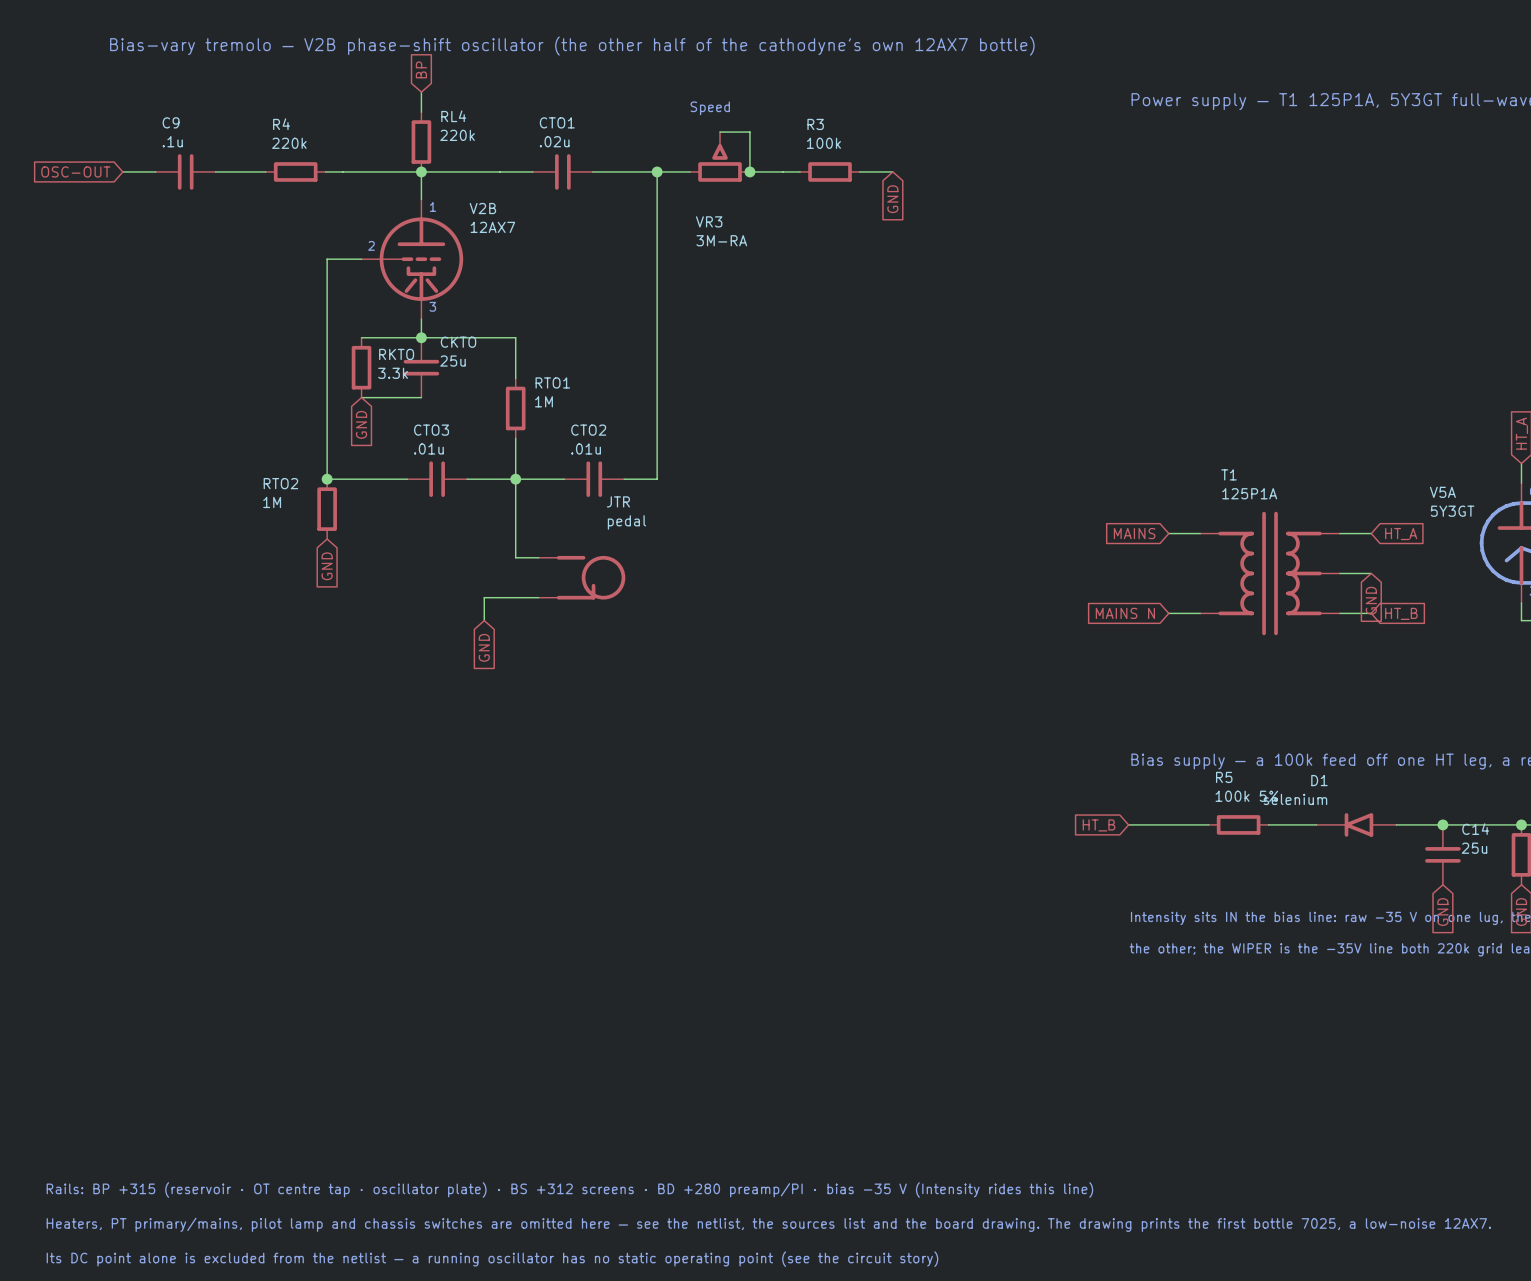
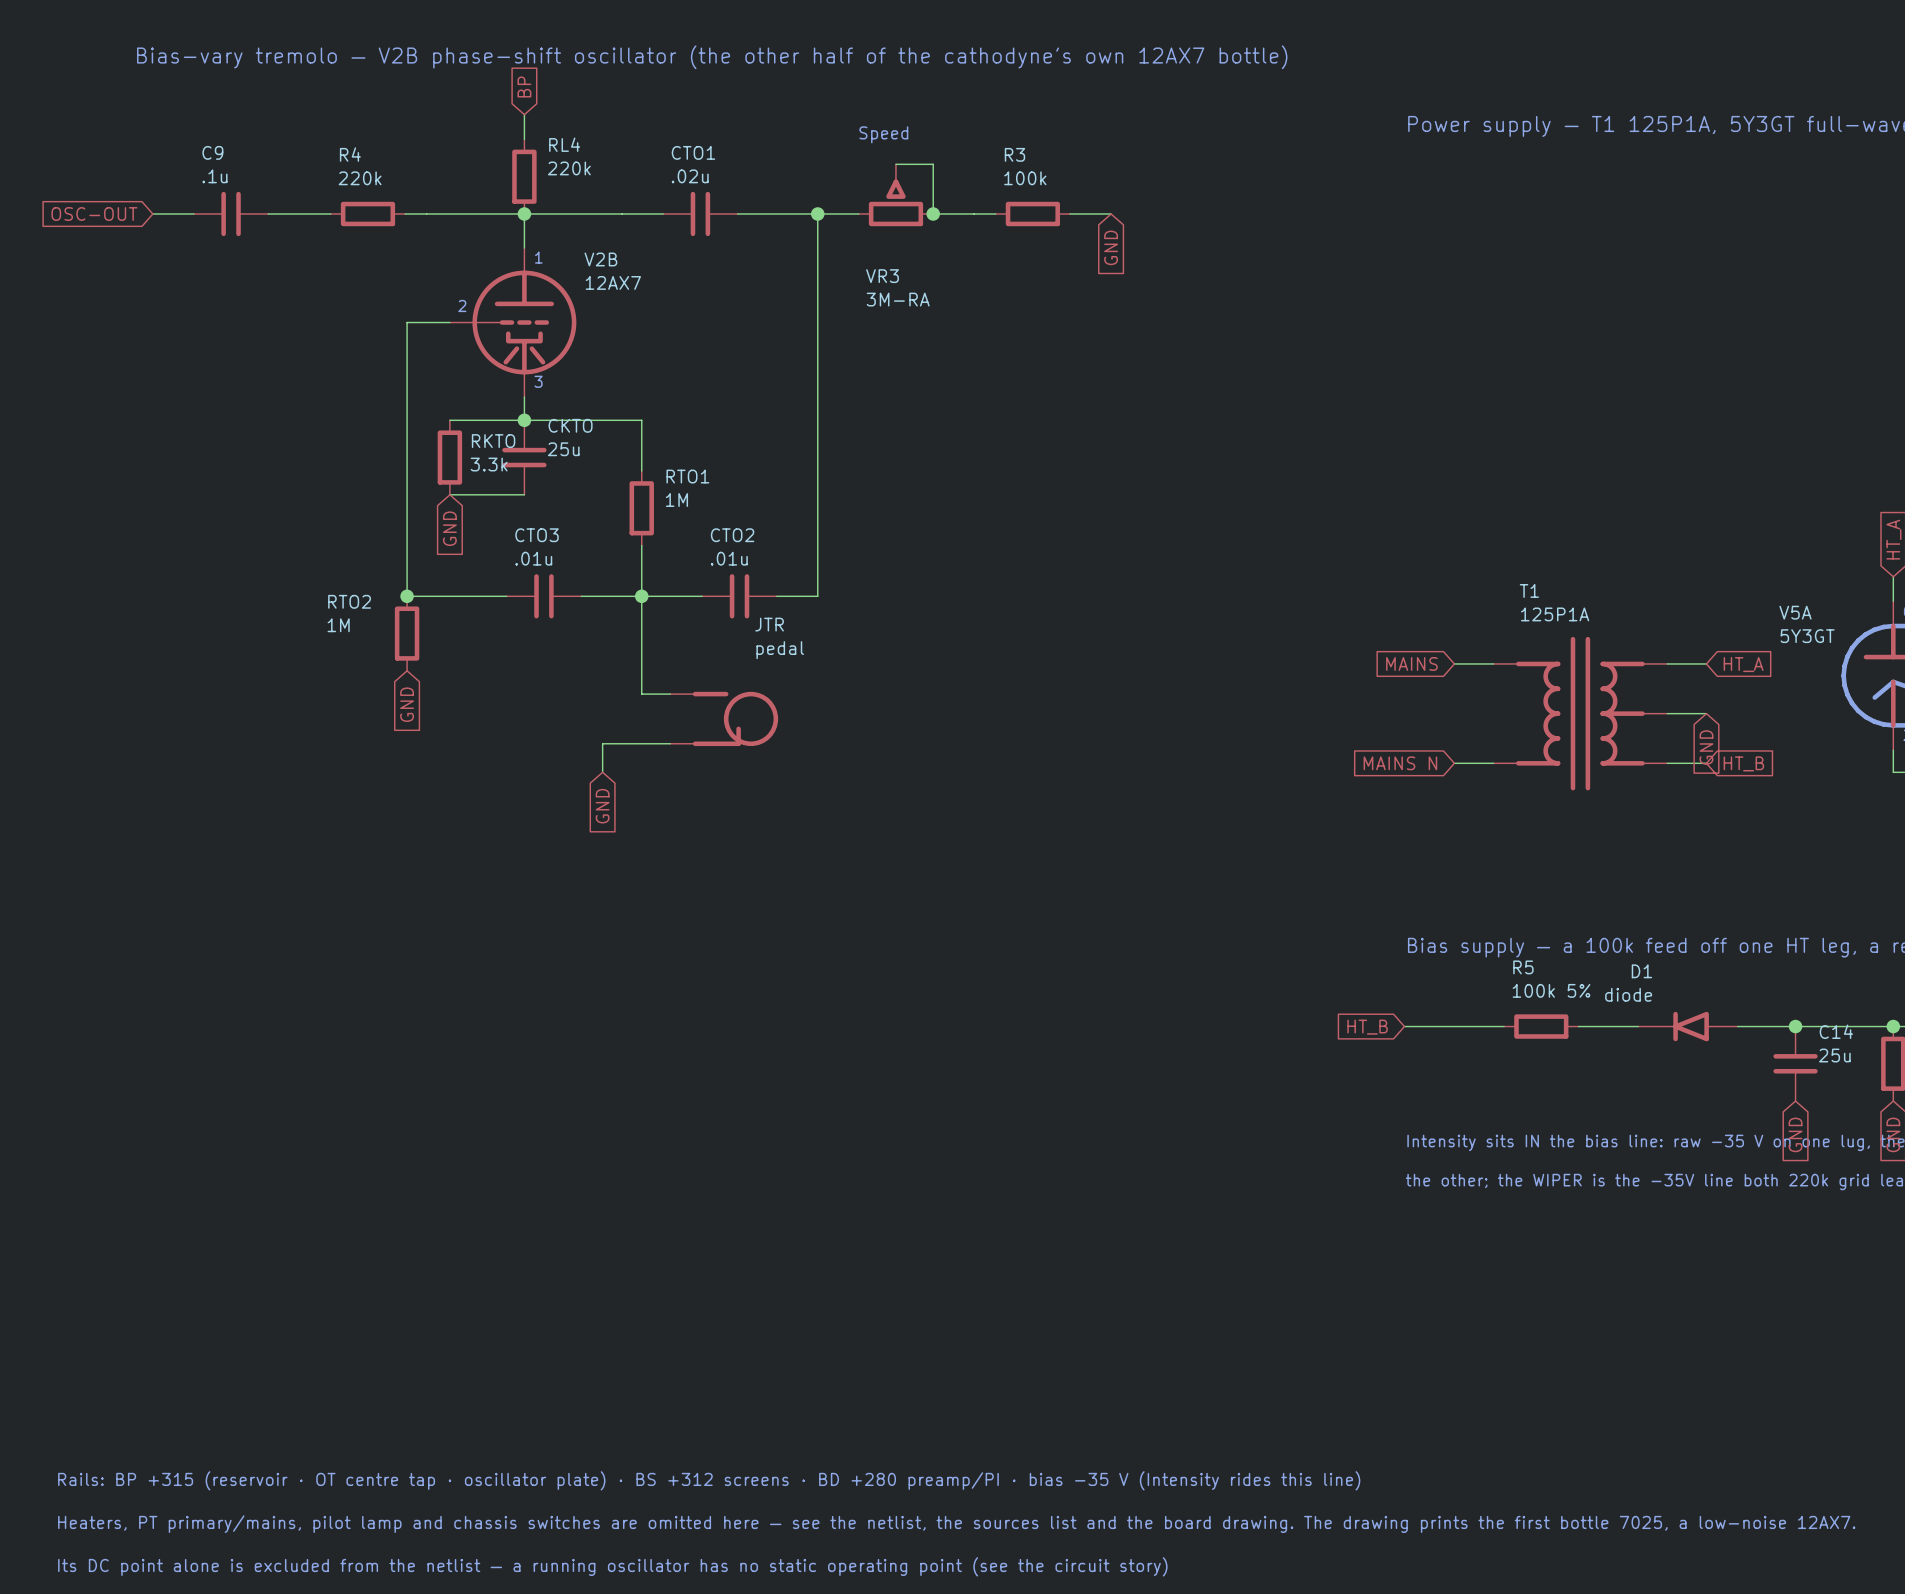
D1 value: selenium (1295, 799) -> diode (1628, 994)

